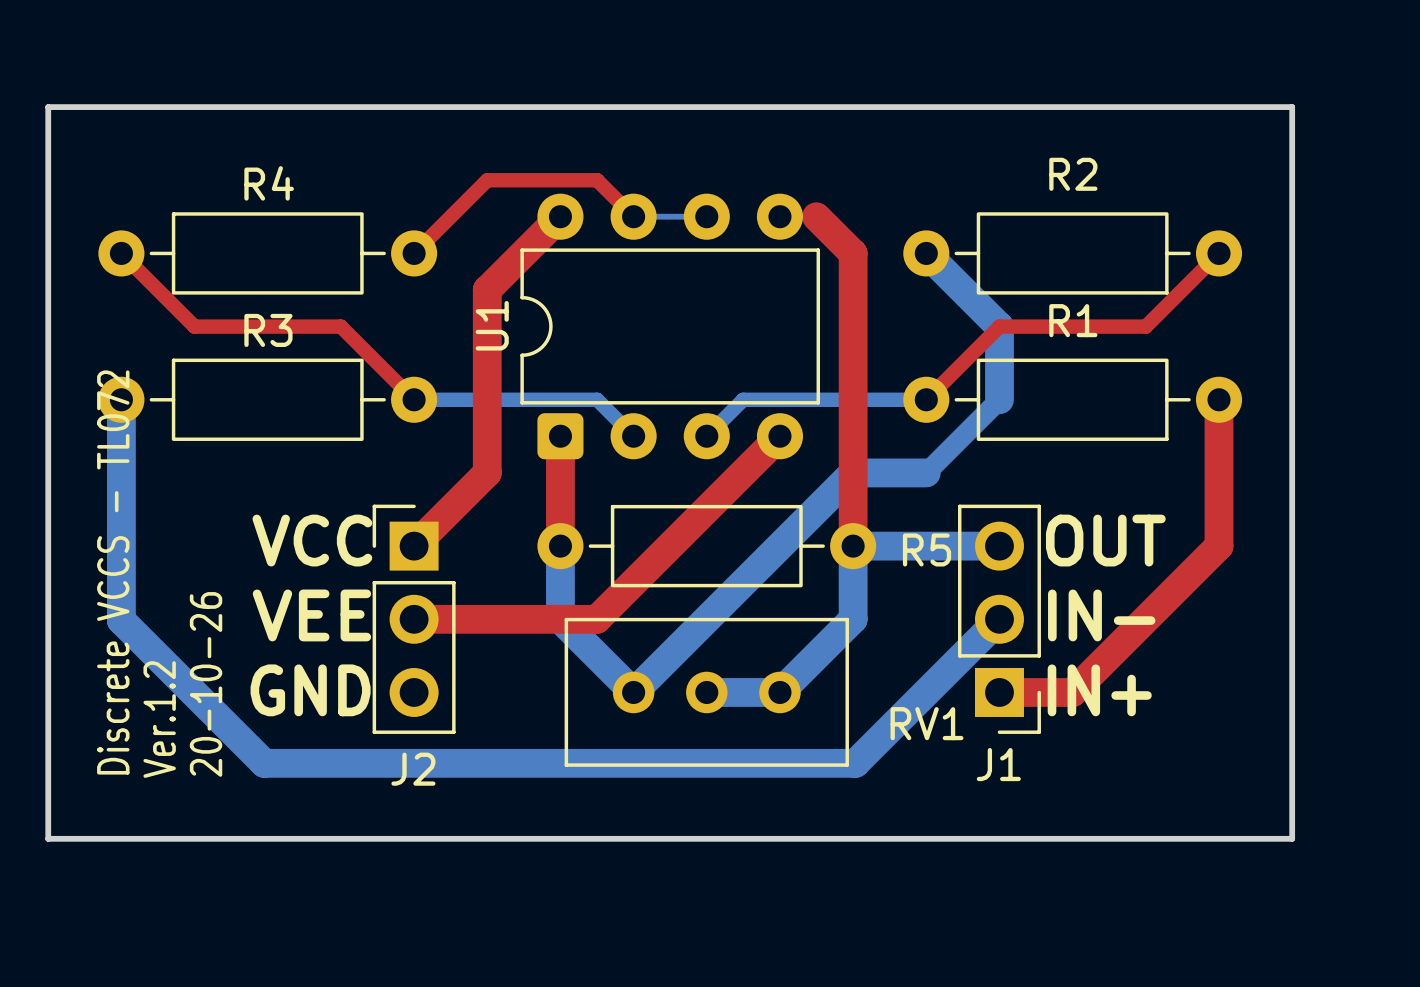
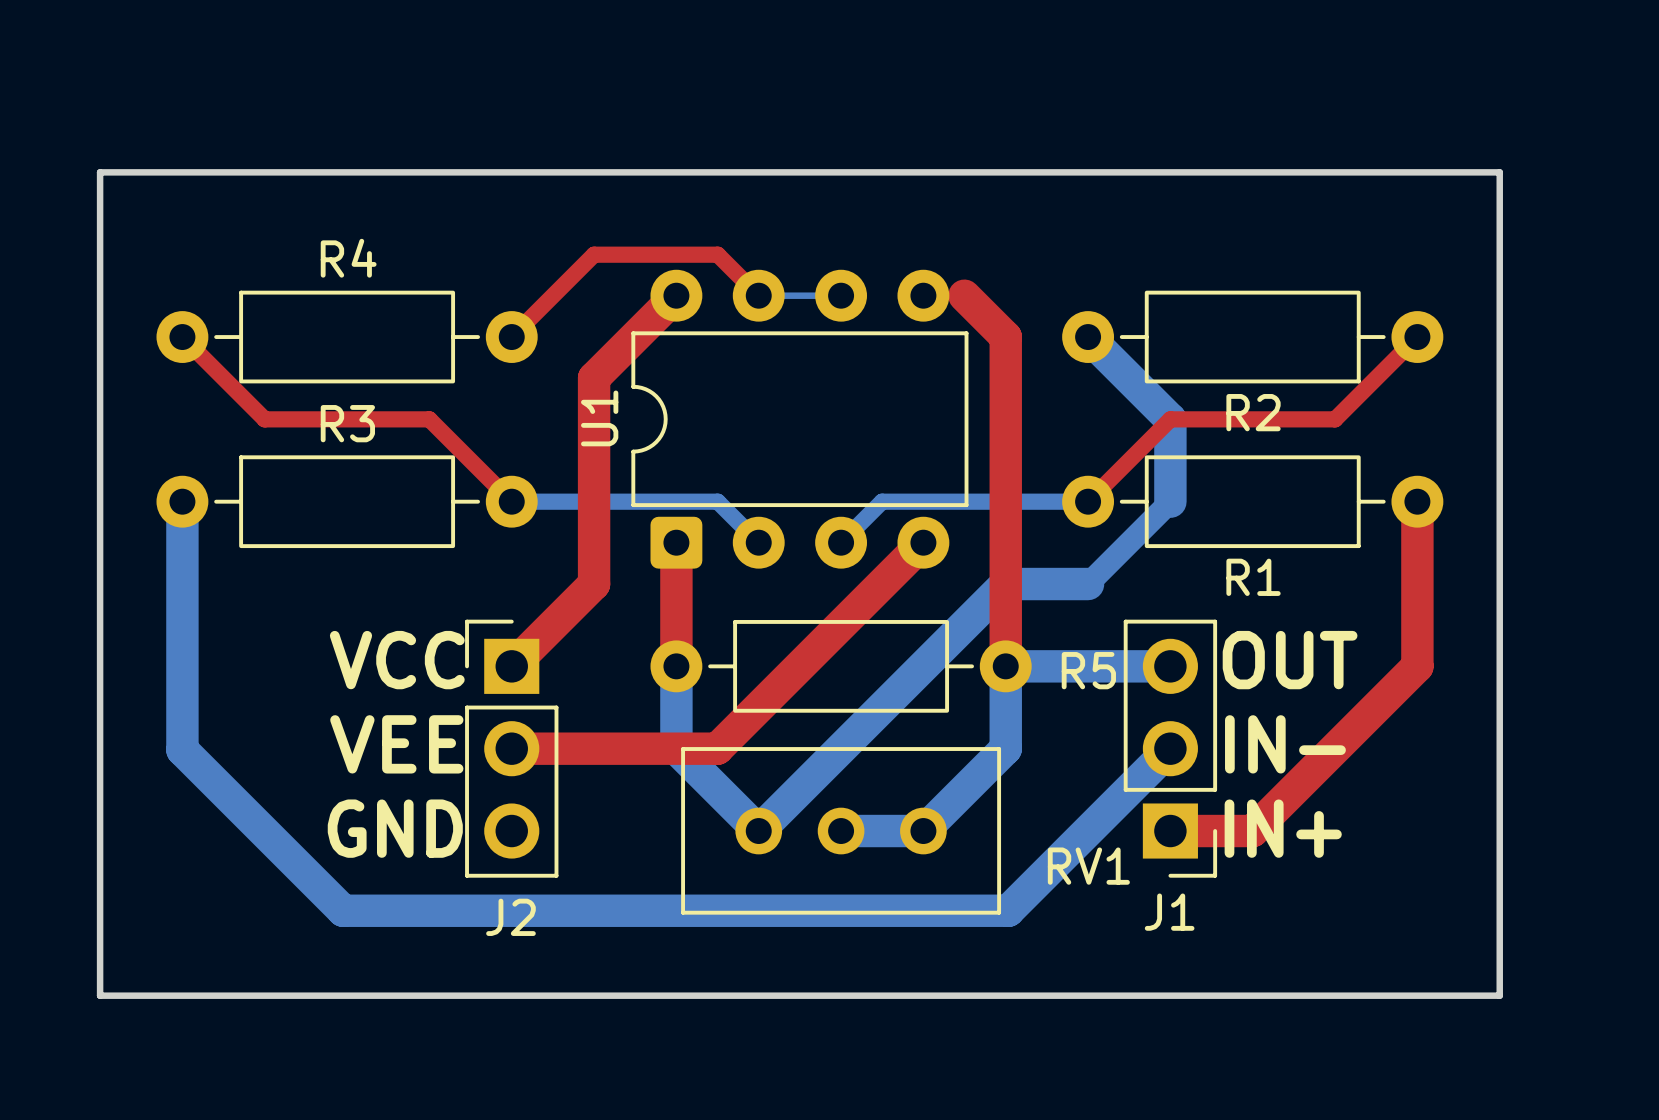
R2 name position: R2 (1073, 174) -> R2 (1253, 412)
R1 name position: R1 (1073, 320) -> R1 (1253, 577)
text: Discrete VCCS - TL072 (113, 572) -> none
text: 20-10-26 (206, 684) -> none
text: Ver.1.2 (159, 719) -> none

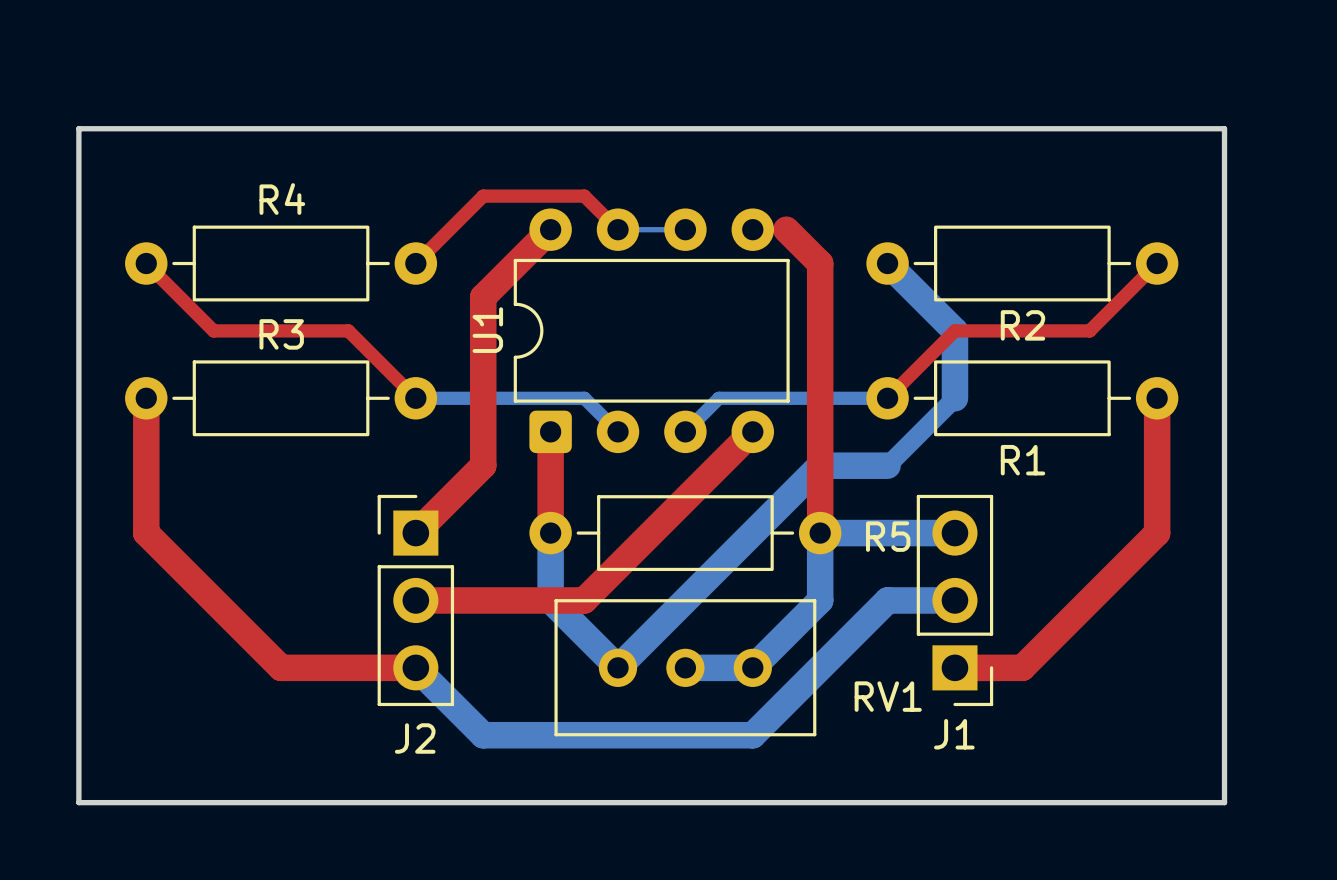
top track: none -> (146, 398) (146, 533) (281, 667) (415, 667)
bottom track: (182, 501) (182, 749) (343, 910) (1008, 910) (1170, 748) -> (415, 667) (483, 735) (752, 735) (887, 600) (954, 600)
text: VCC (397, 660) -> none
text: OUT (1290, 660) -> none
text: VEE (396, 744) -> none
text: IN- (1285, 744) -> none
text: GND (395, 828) -> none
text: IN+ (1283, 828) -> none

